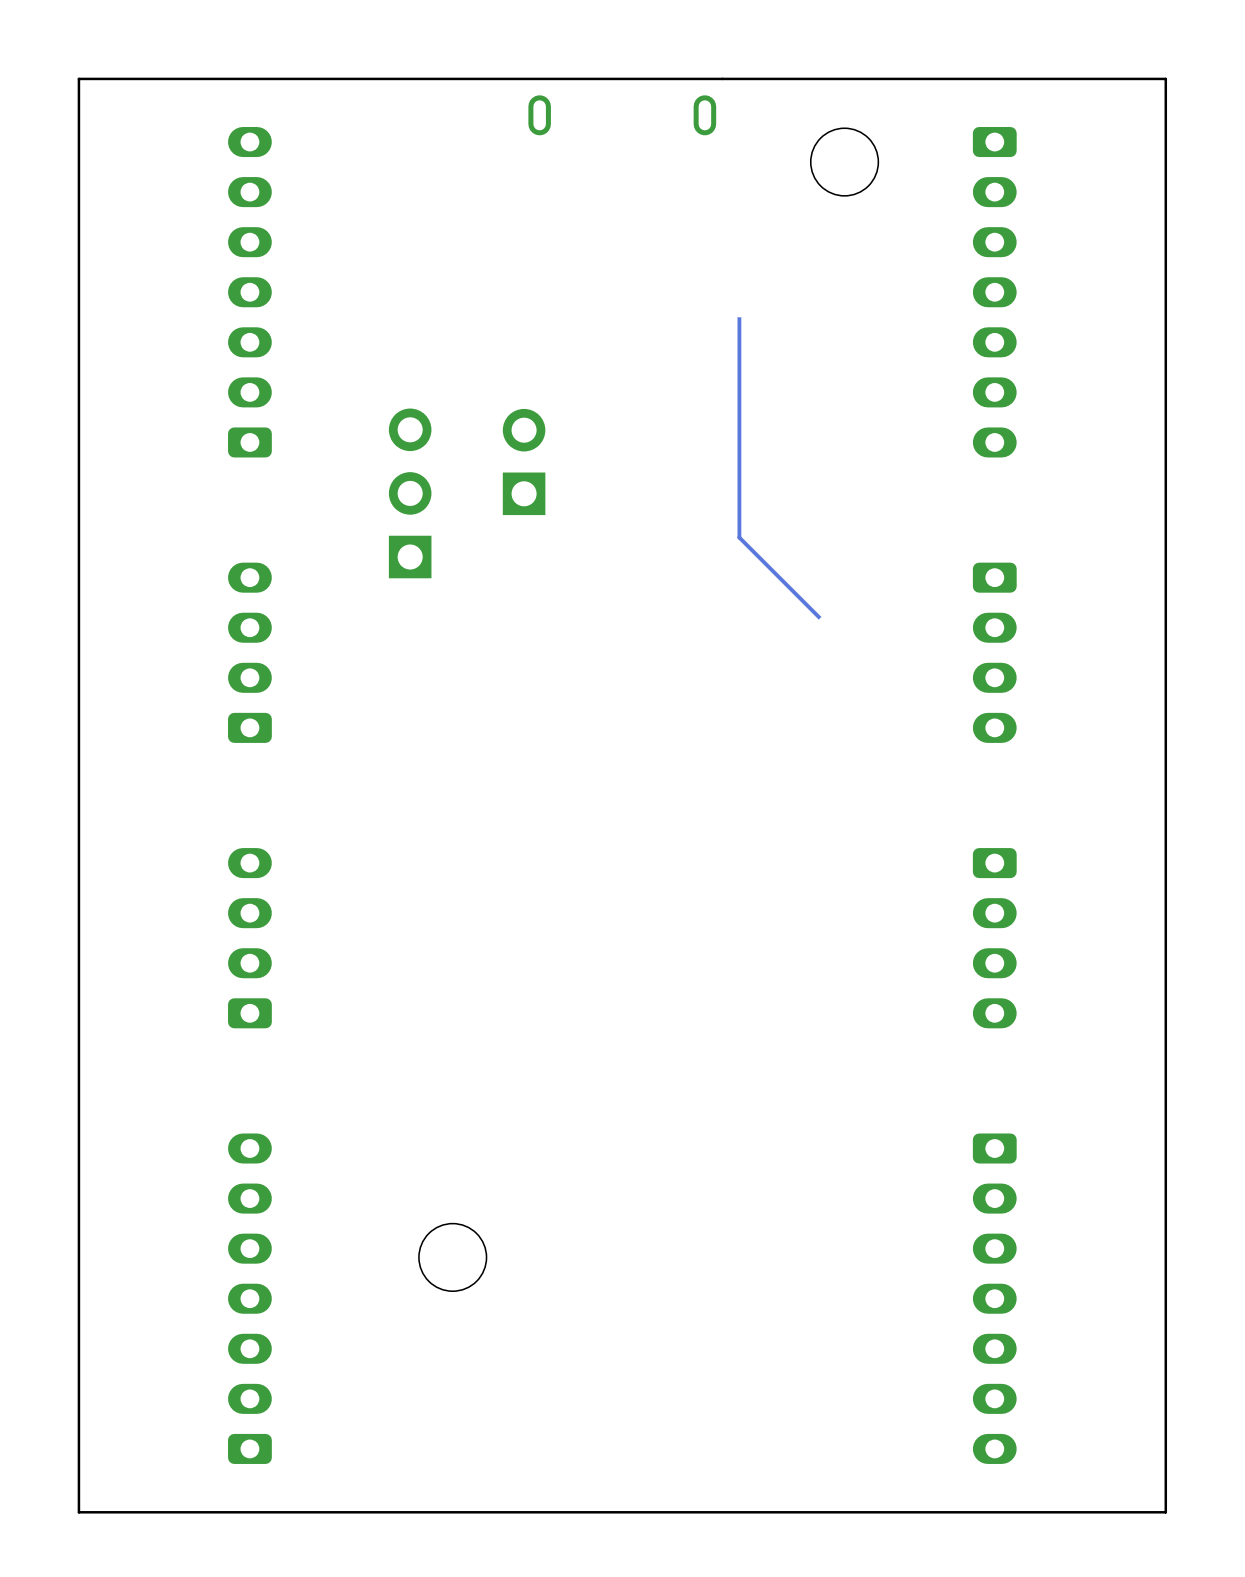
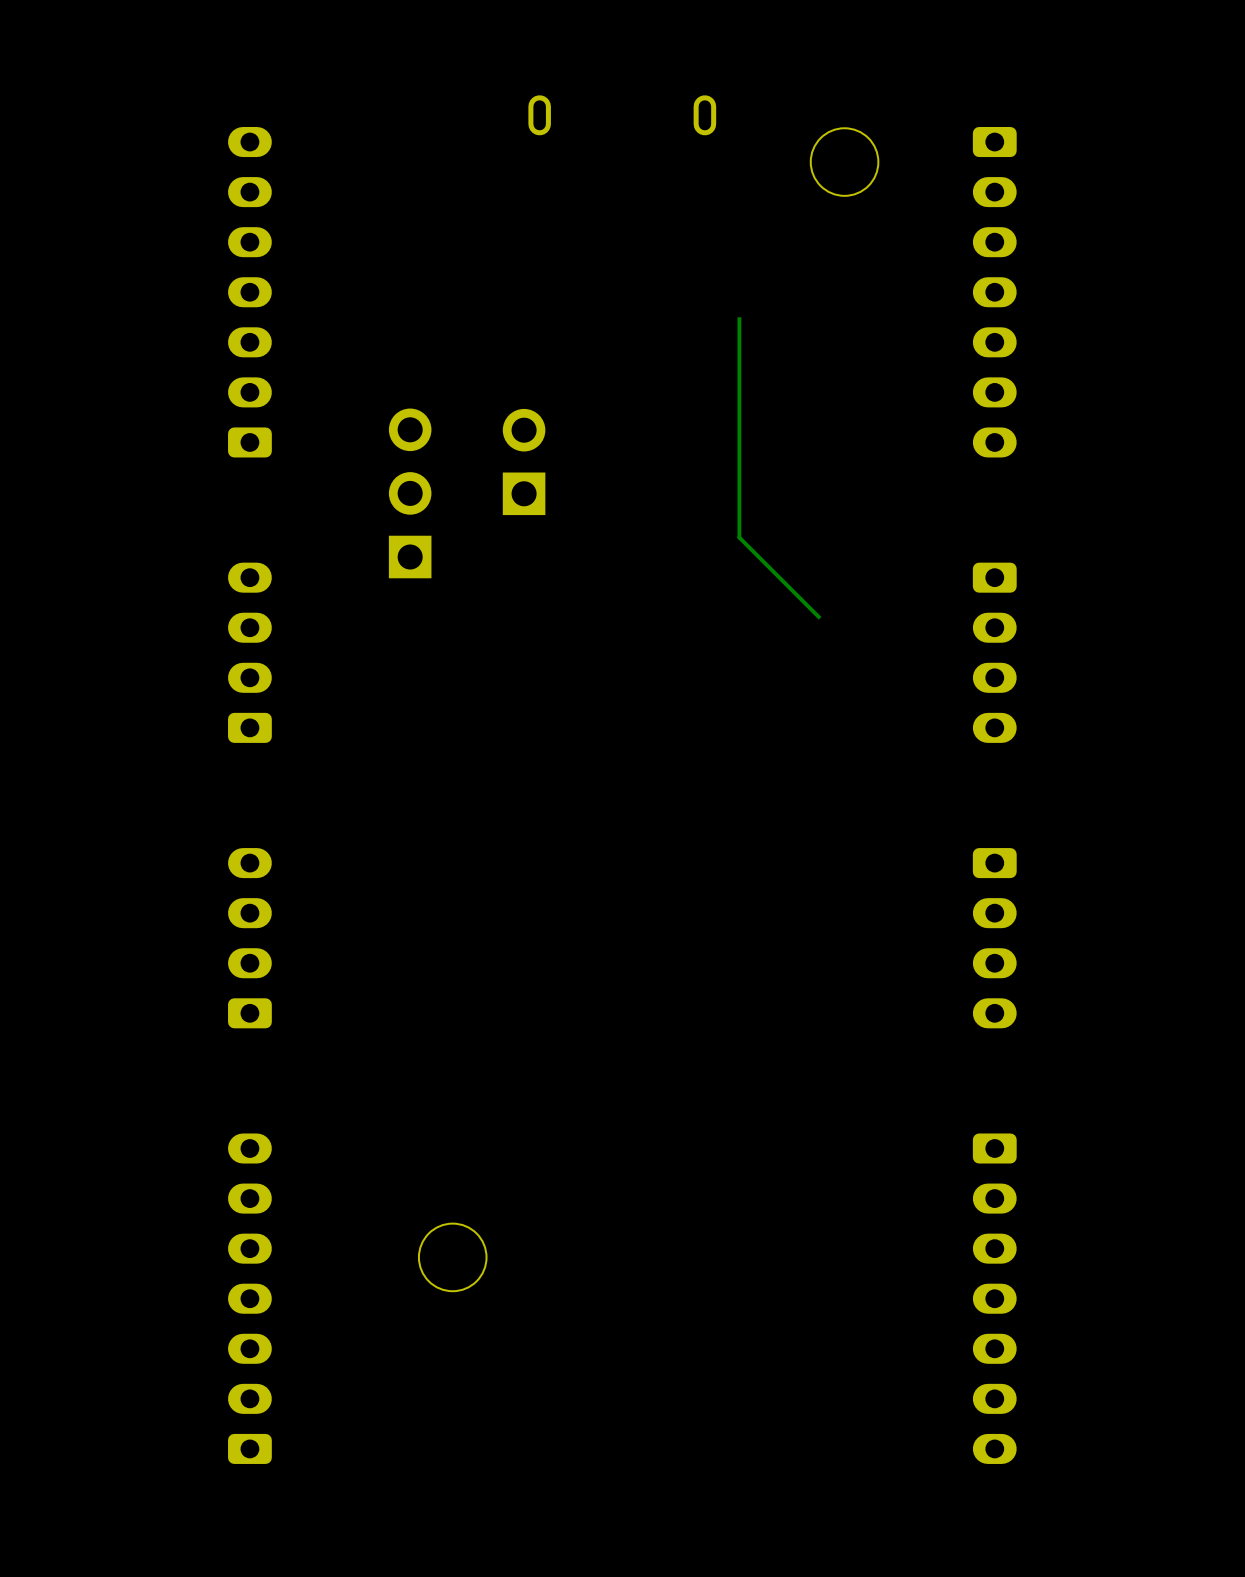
board edge: (1165, 78) (78, 78) (78, 1512) (1165, 1512) (1165, 78) -> none

